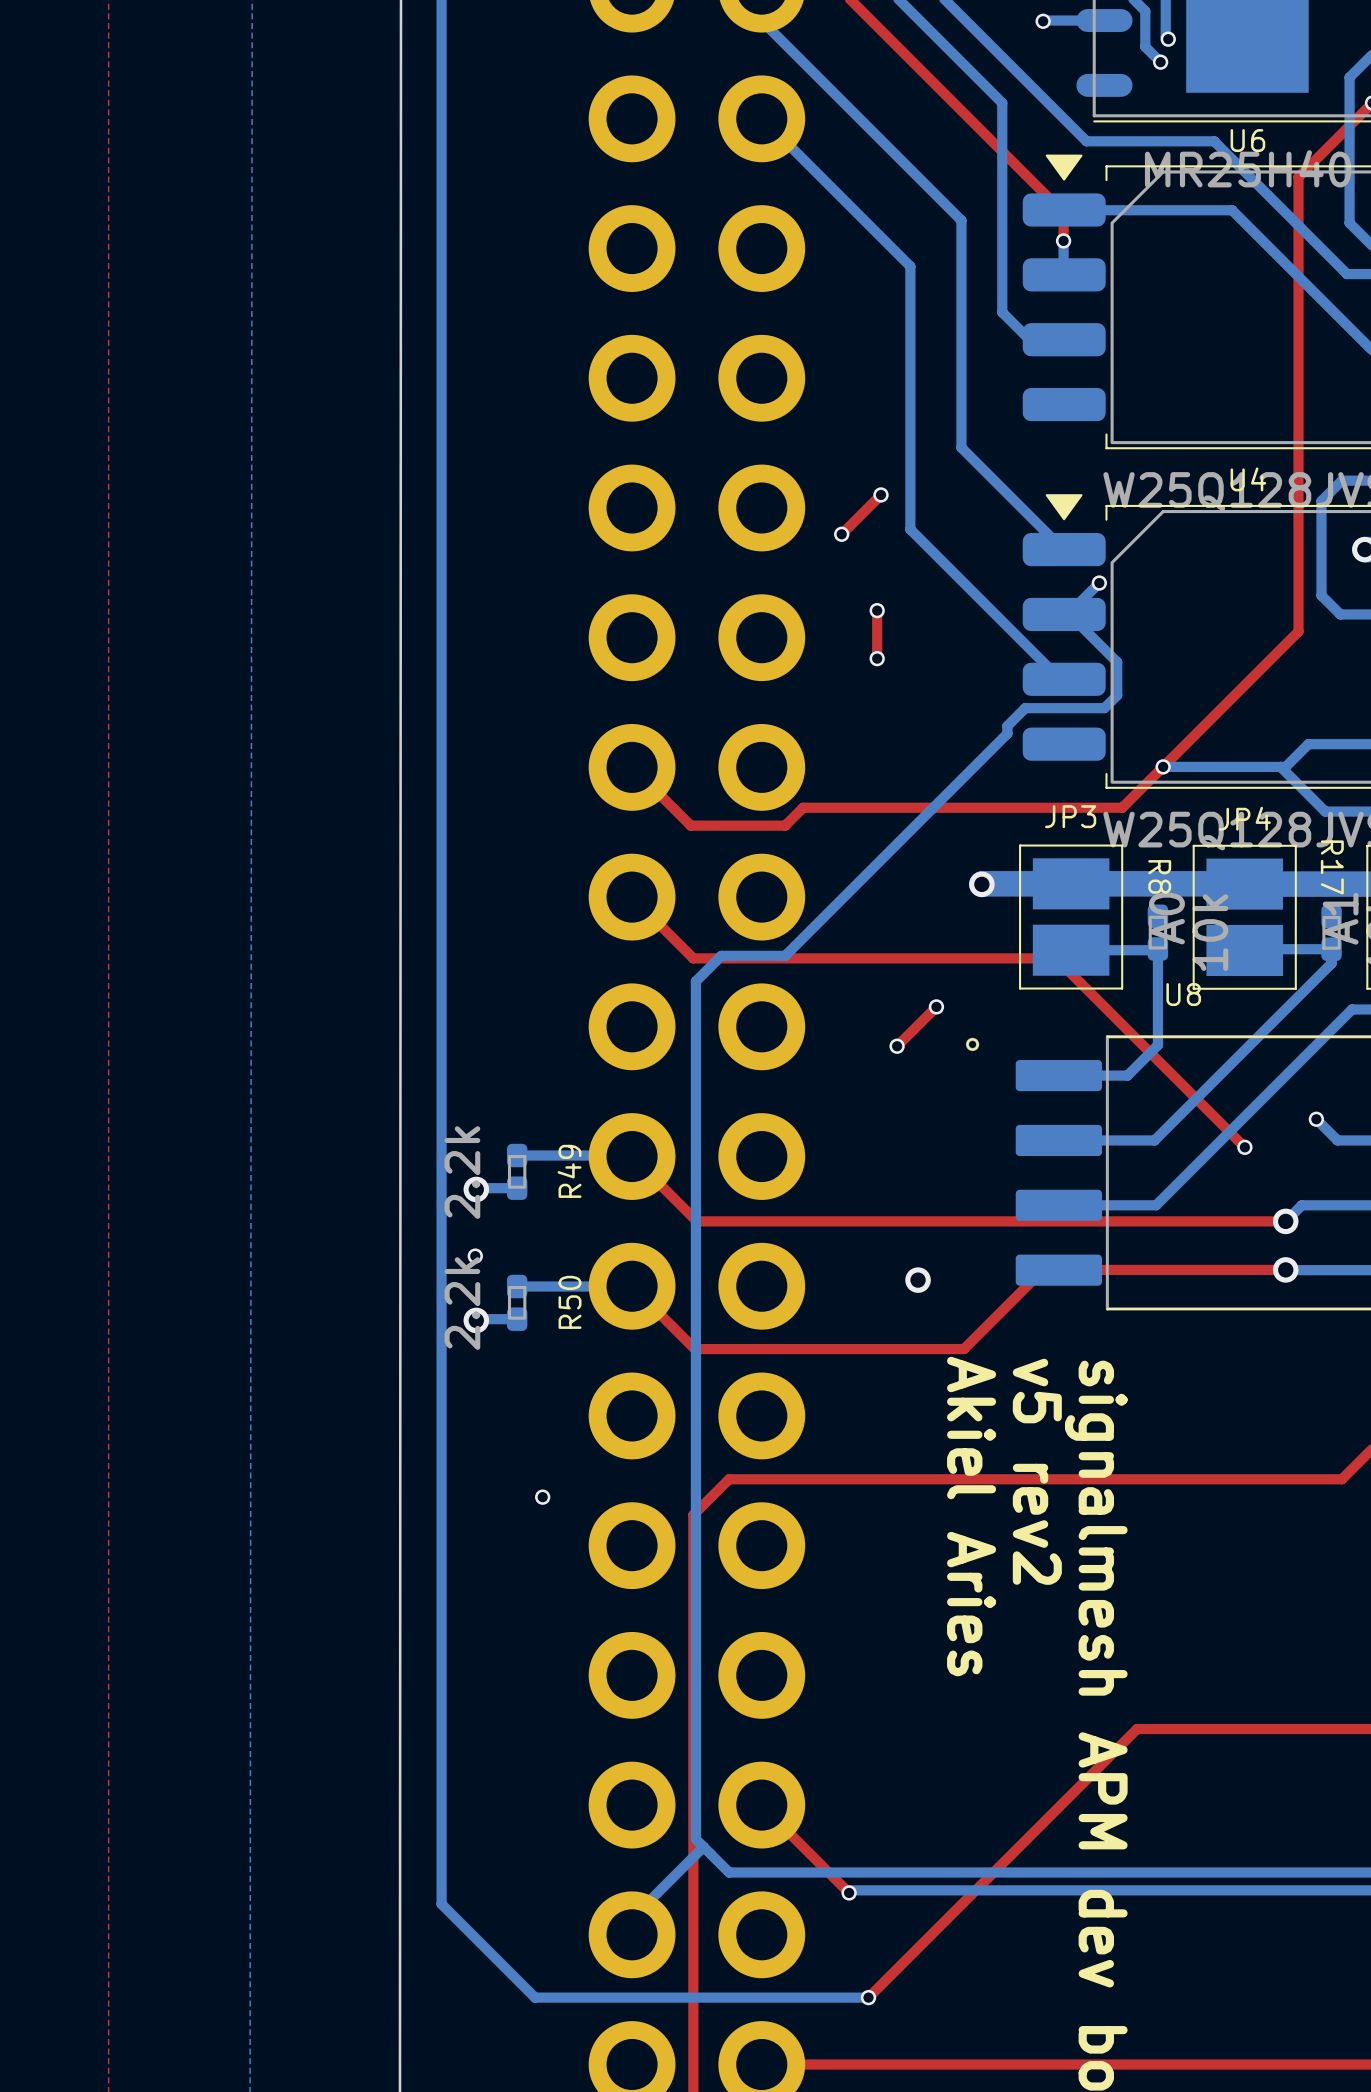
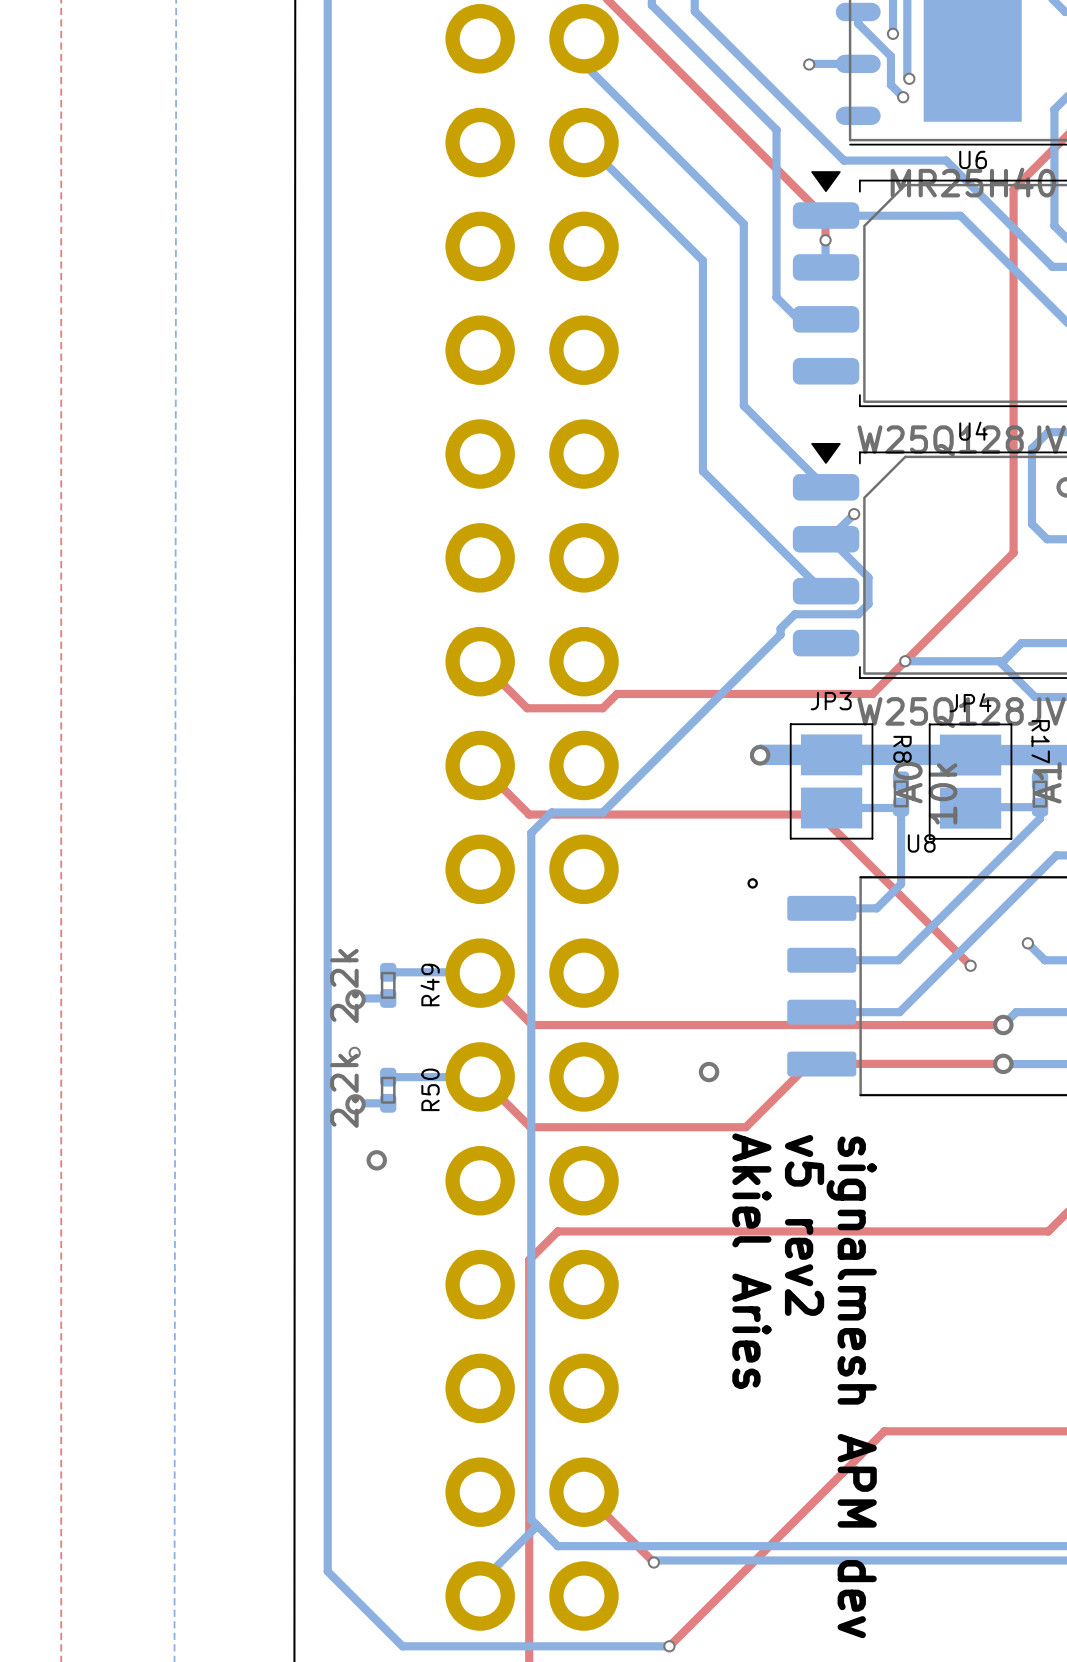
top track: (881, 494) (841, 534) -> none
via: (881, 494) -> none
via: (841, 534) -> none
top track: (877, 610) (877, 658) -> none
via: (877, 610) -> none
via: (877, 658) -> none
top track: (936, 1006) (897, 1046) -> none
via: (936, 1006) -> none
via: (897, 1046) -> none
via: none -> (376, 1160)
via: (542, 1497) -> none

